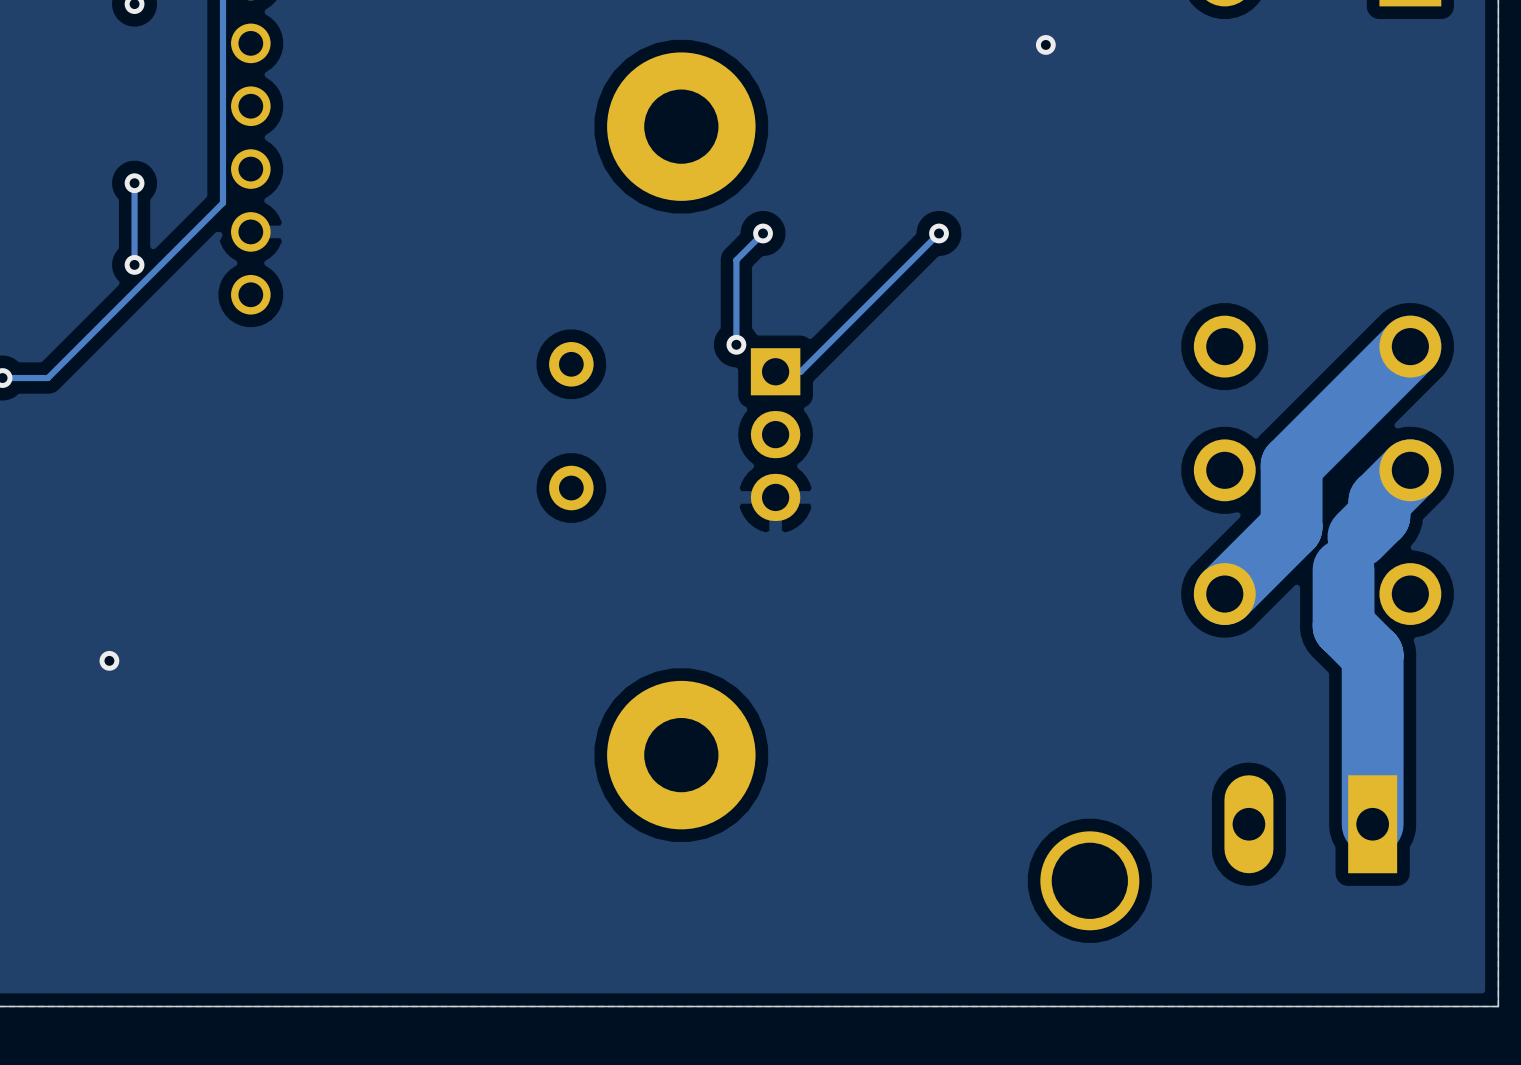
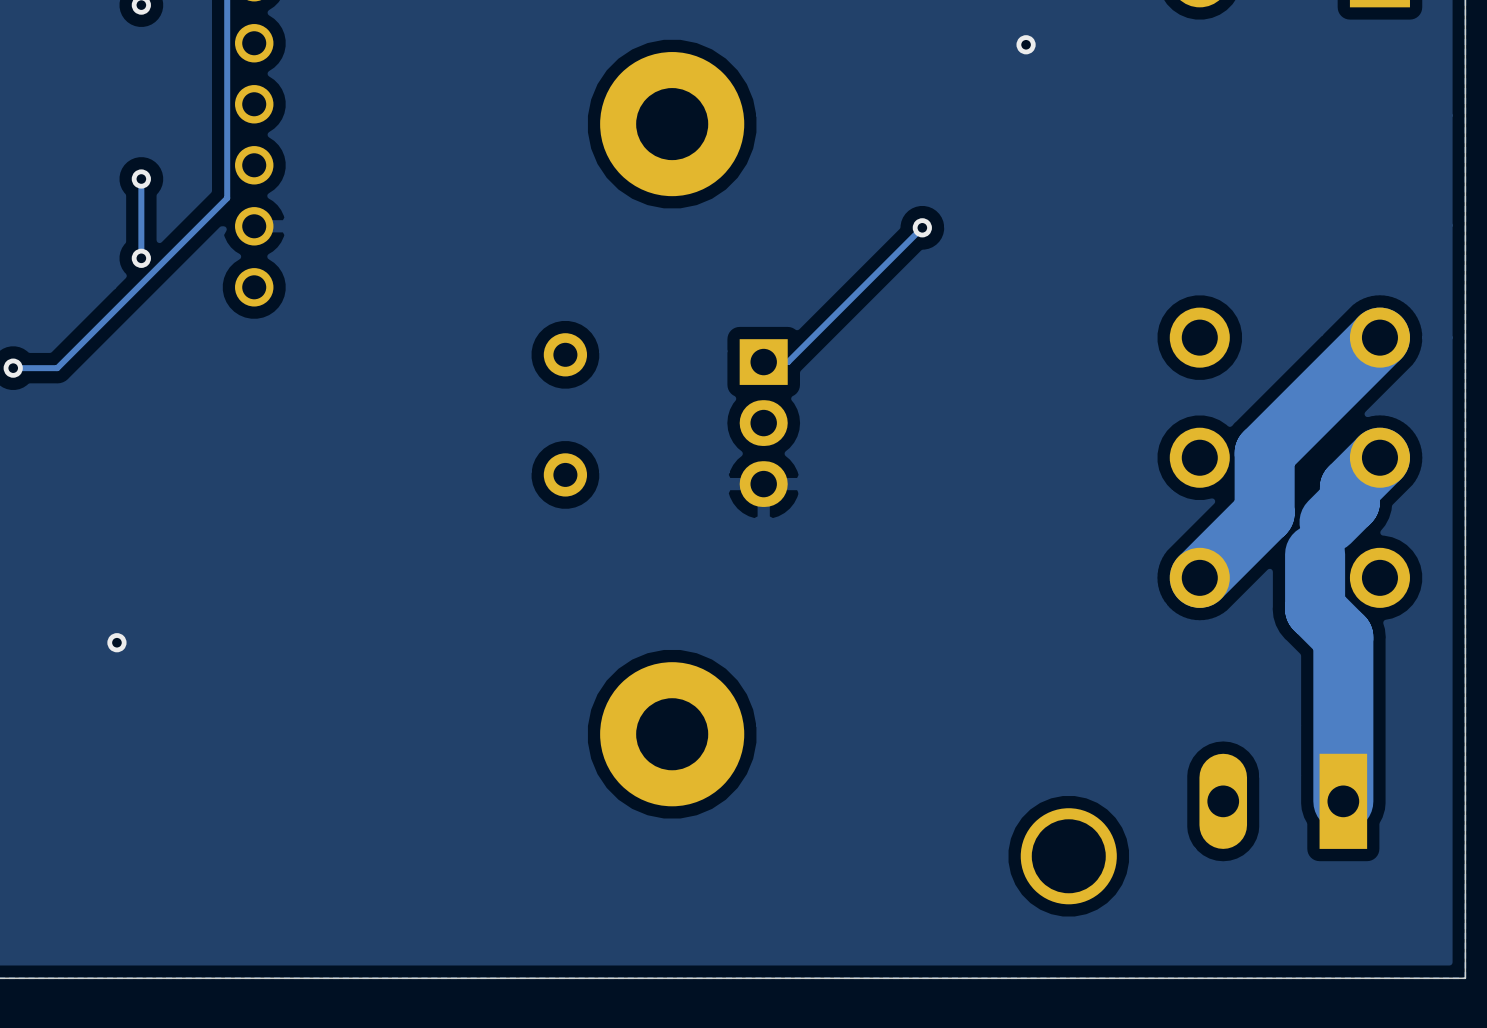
track: (763, 233) (736, 260) (736, 344) -> none
via: (763, 233) -> none
via: (736, 344) -> none

